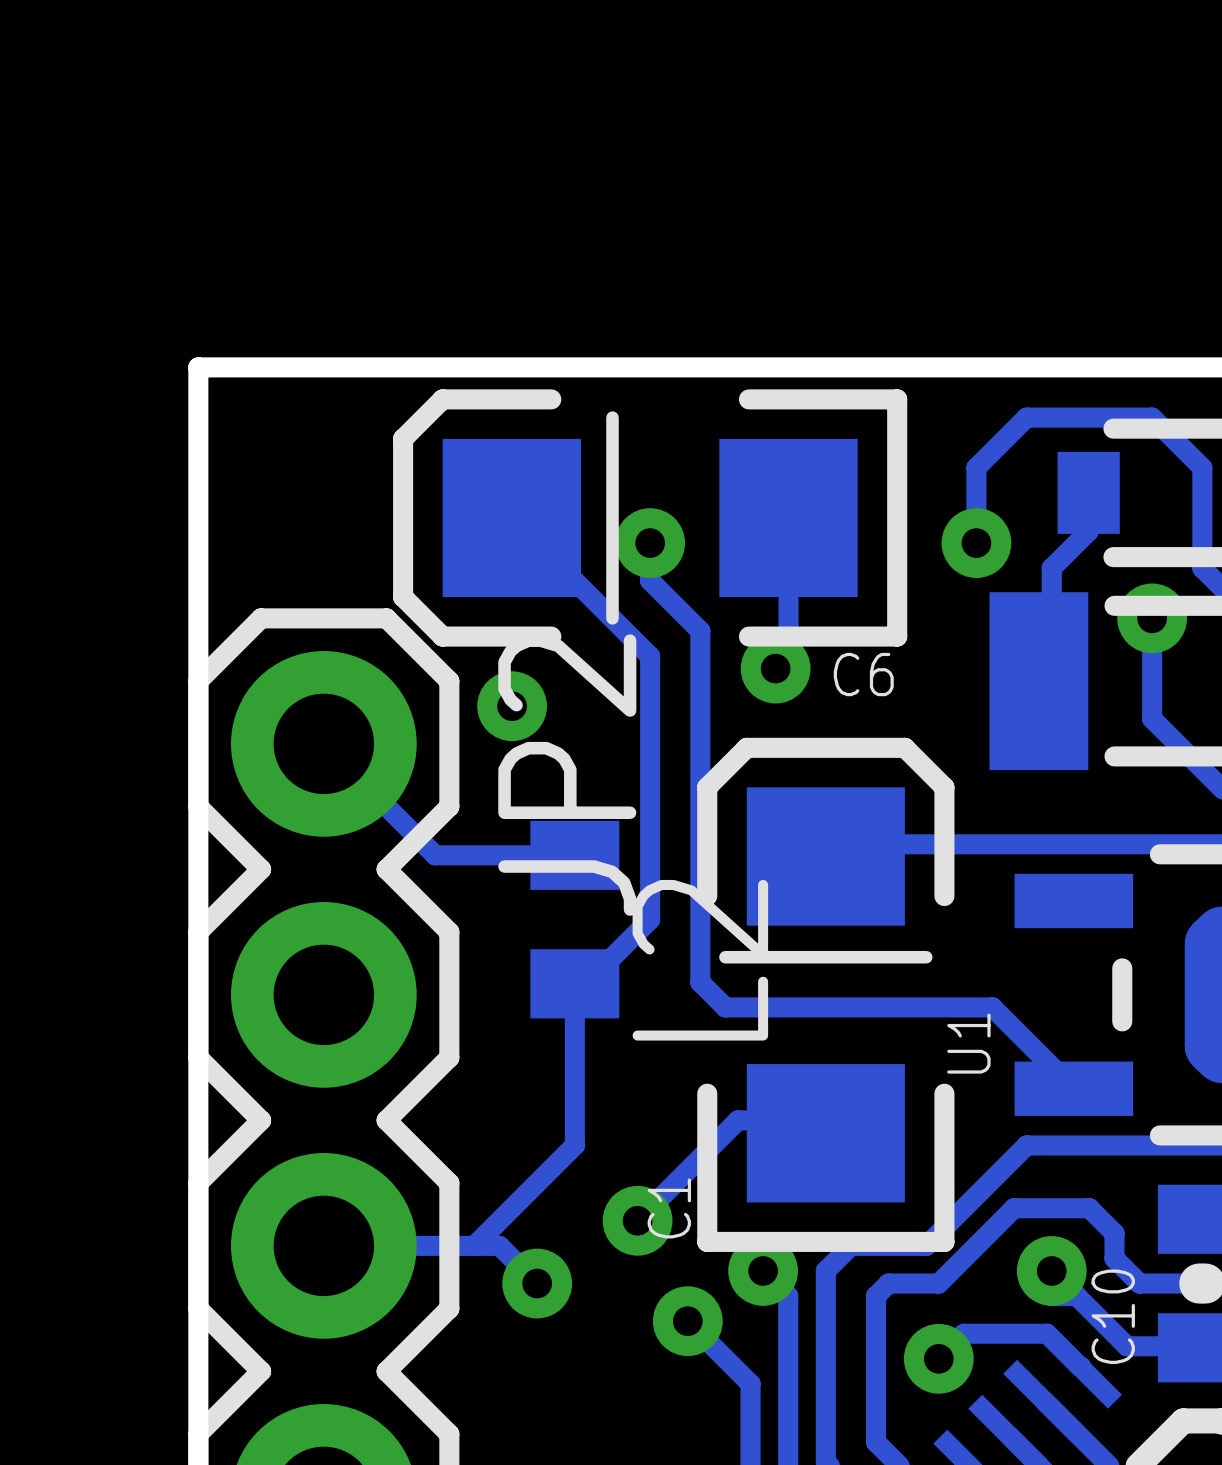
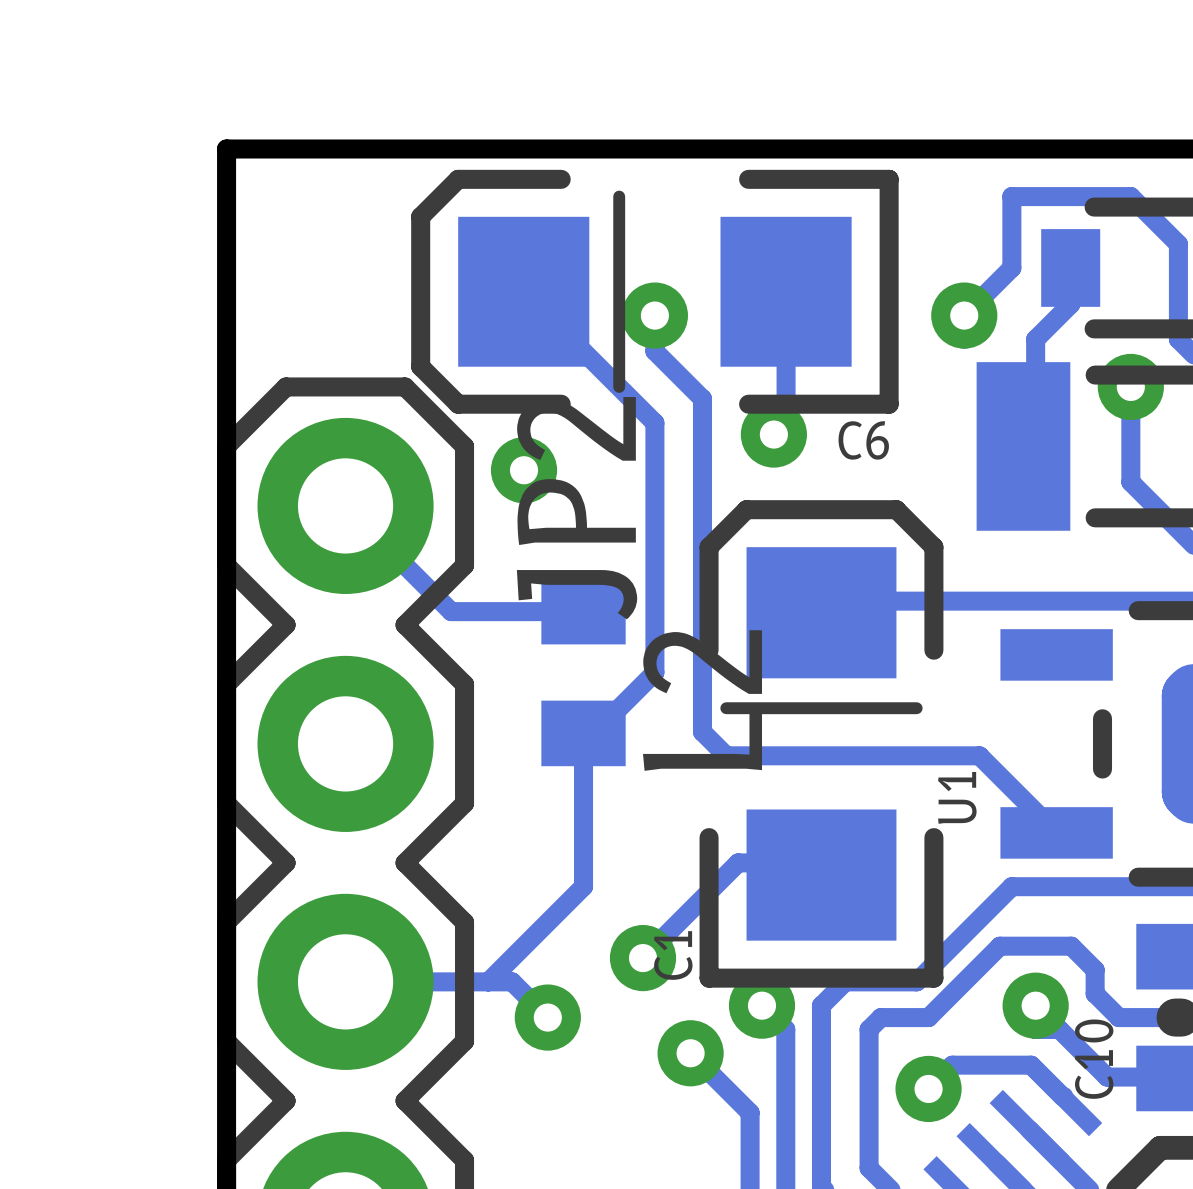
track: (1026, 417) (976, 467) (976, 543) -> (1011, 196) (1011, 267) (964, 315)

